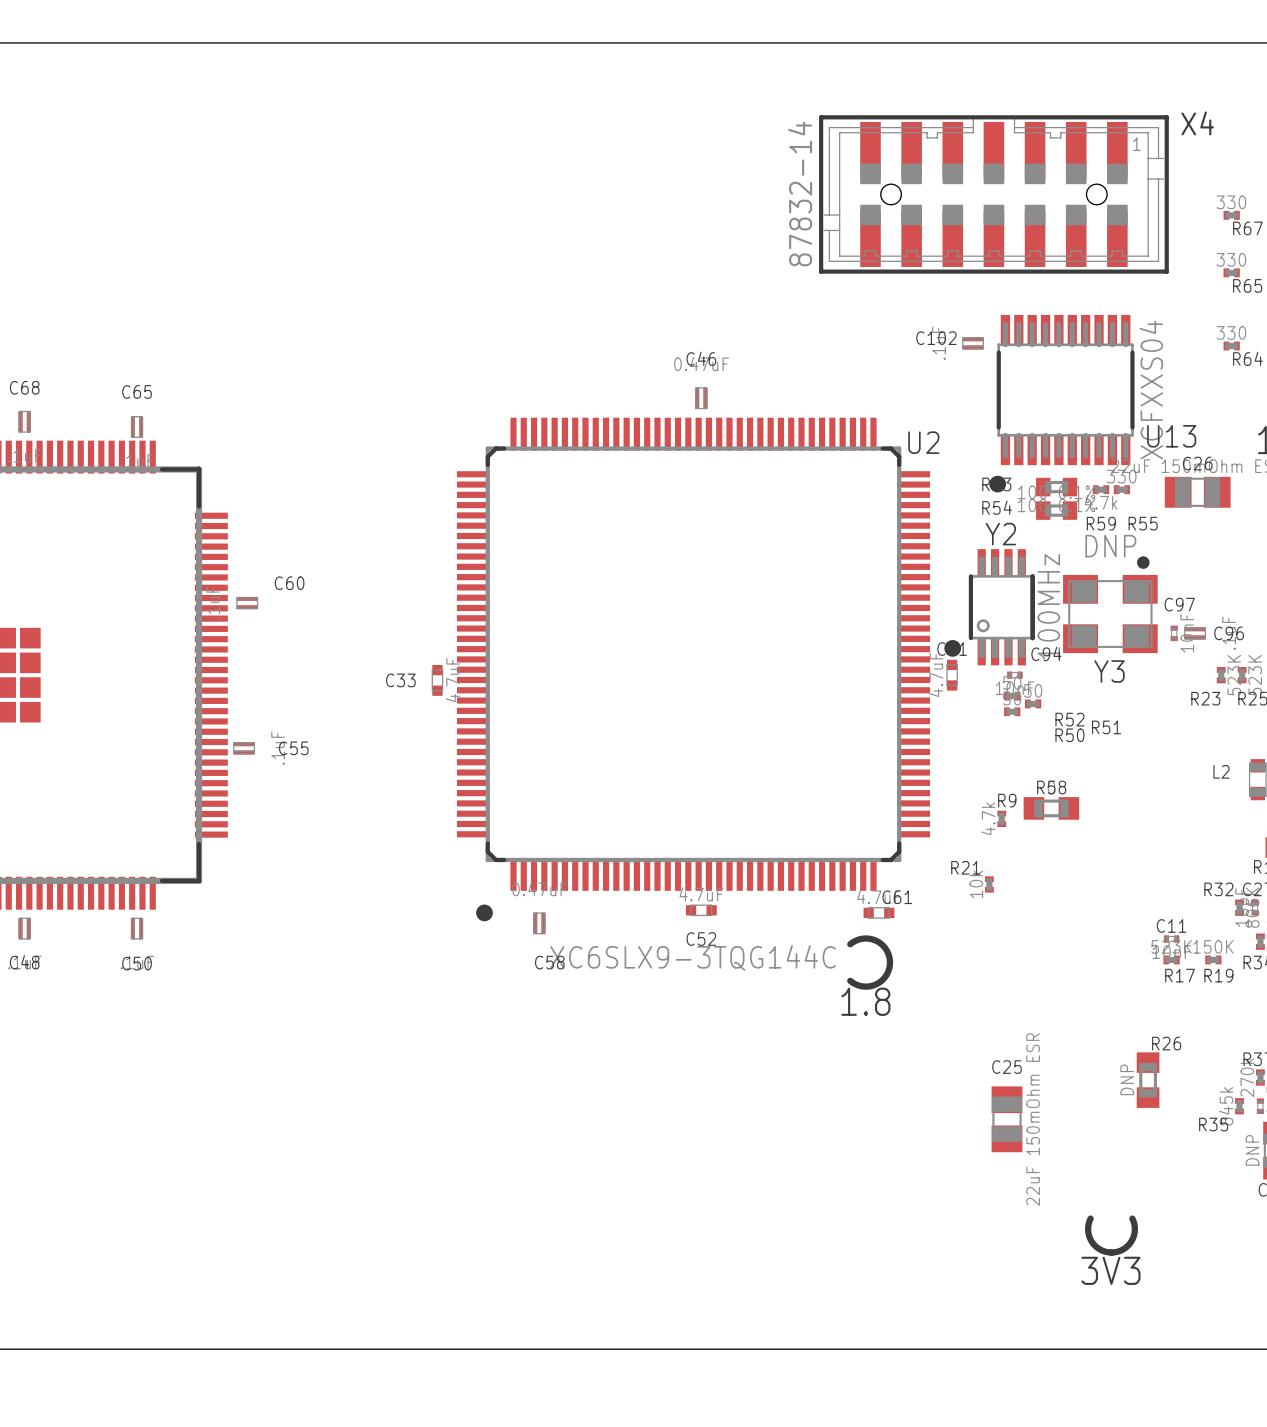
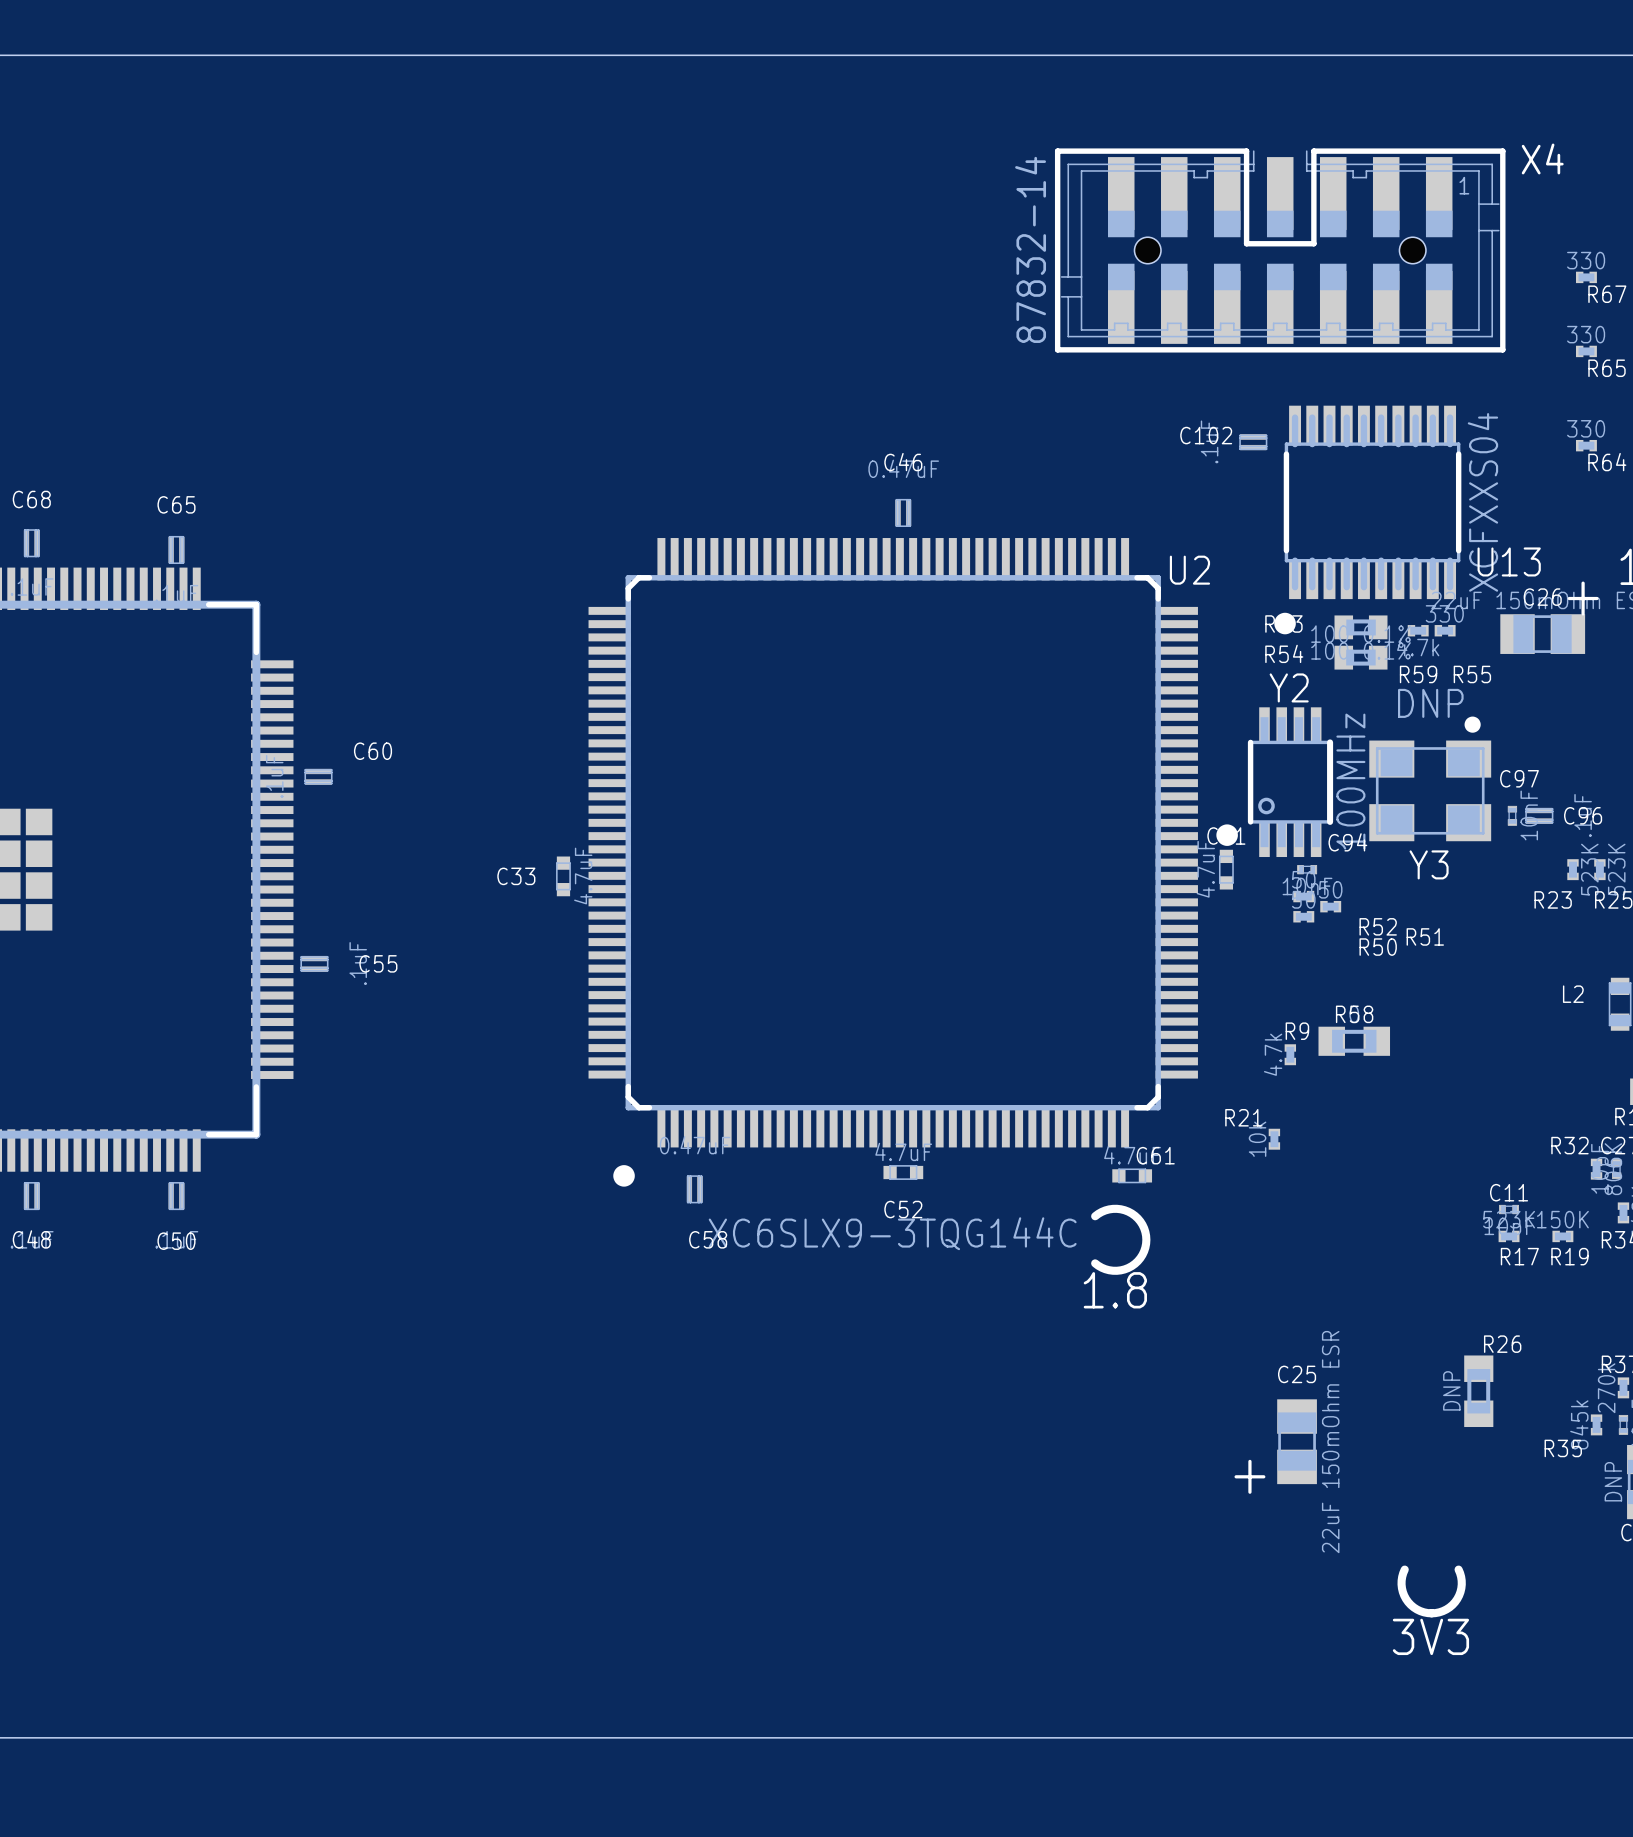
X4 footprint: [819, 115, 1169, 274] -> [1054, 148, 1506, 353]
text: none -> + (1583, 598)
text: none -> + (1249, 1476)

